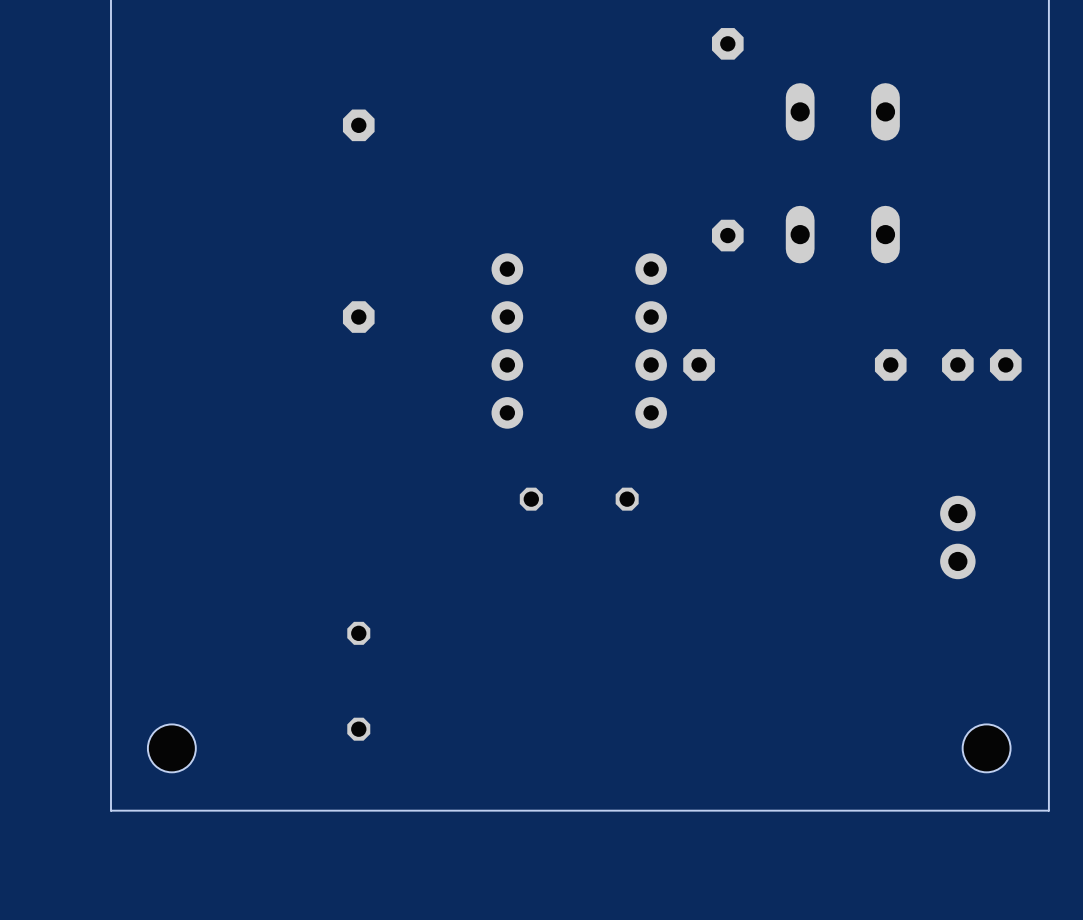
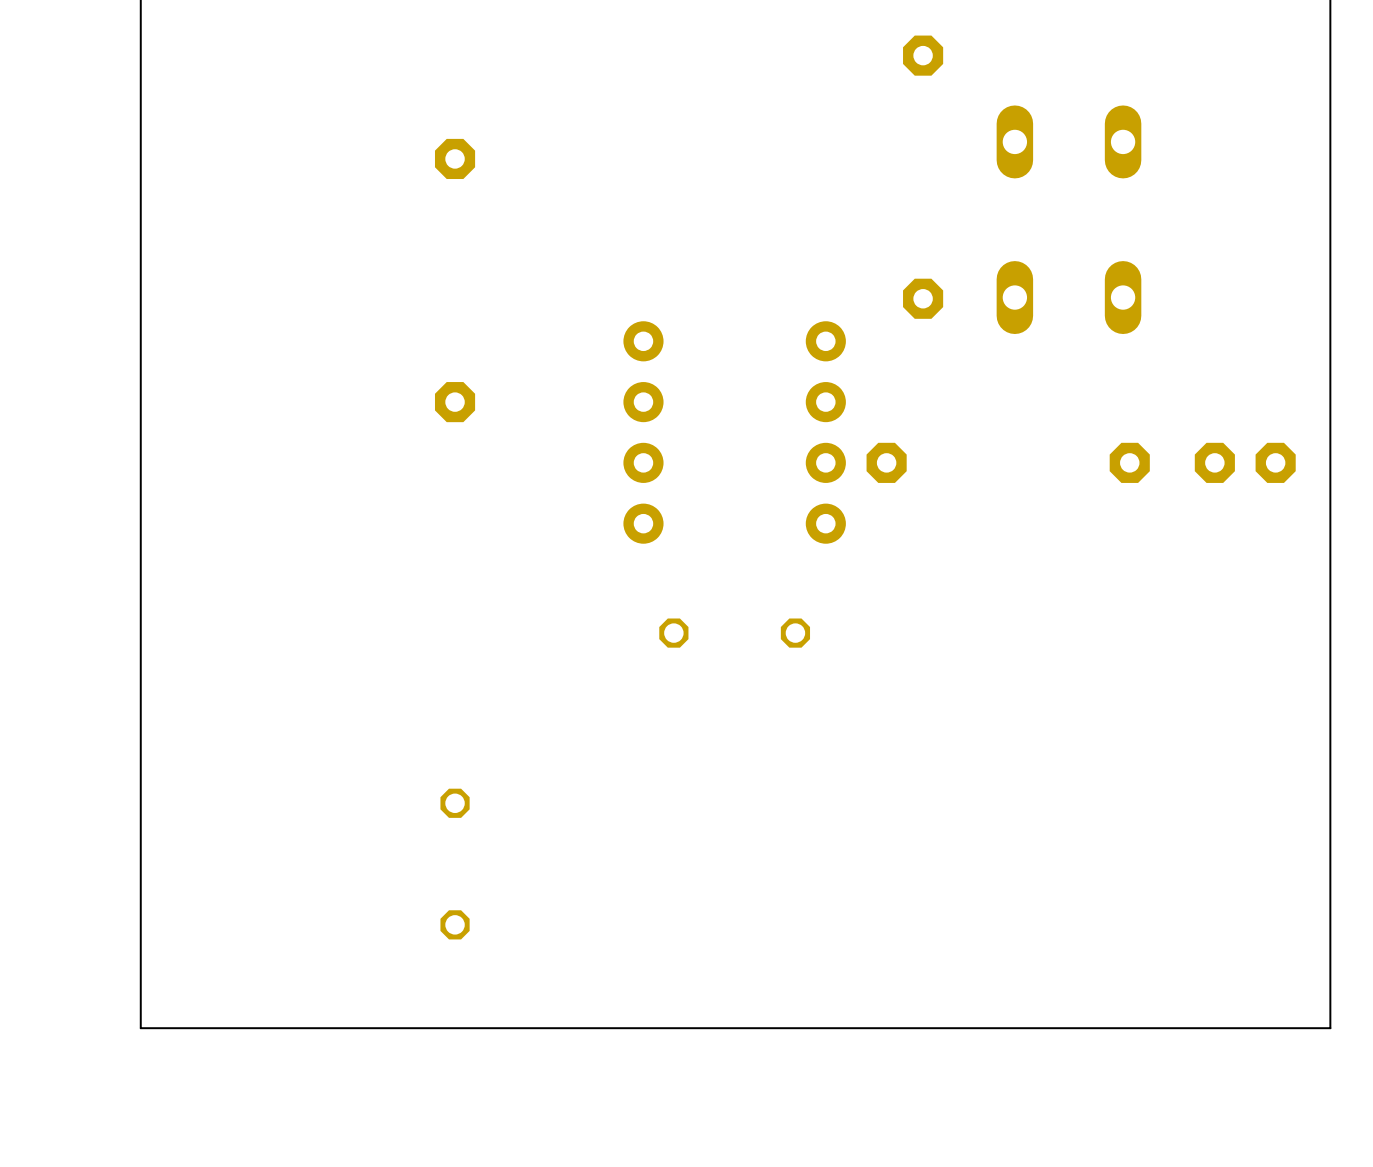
part: (957, 537) -> none
hole: (171, 748) -> none
hole: (986, 748) -> none

